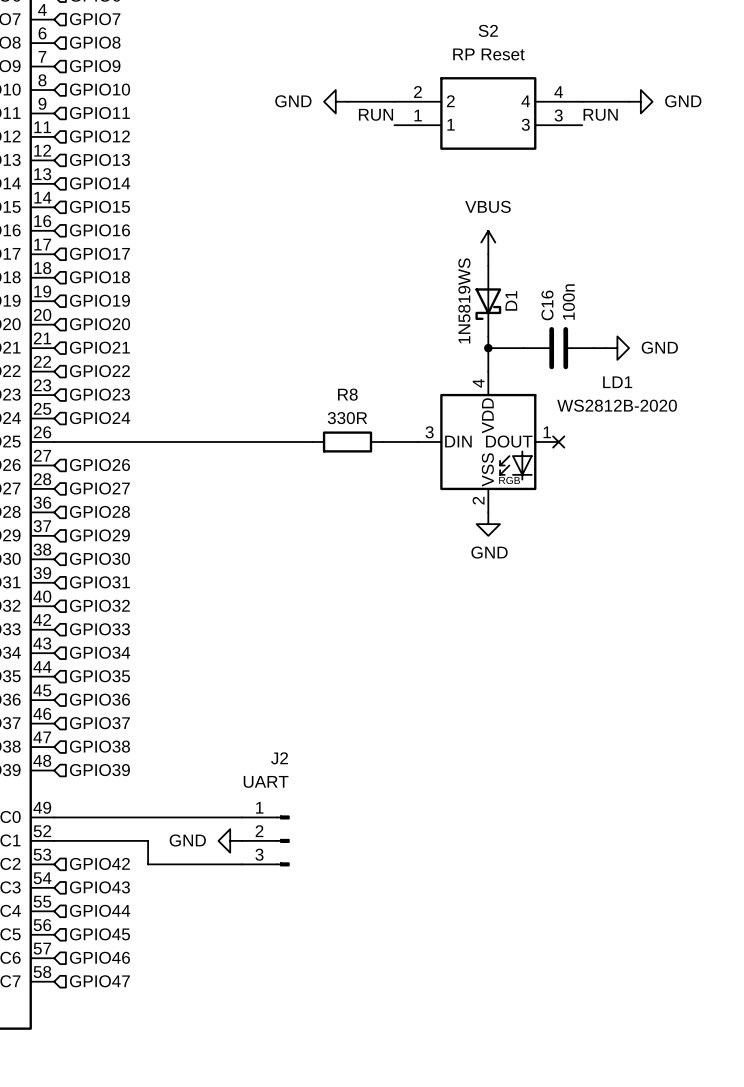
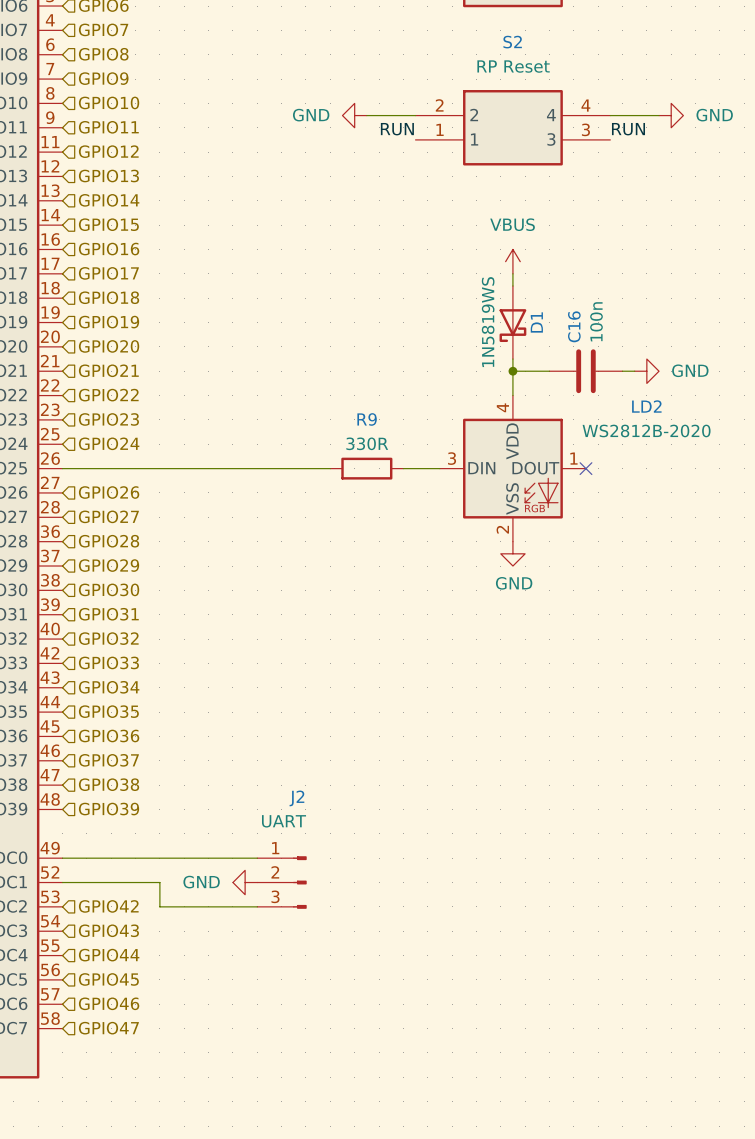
LD1 name: LD1 (617, 382) -> LD2 (646, 406)
R8 name: R8 (347, 394) -> R9 (367, 419)

